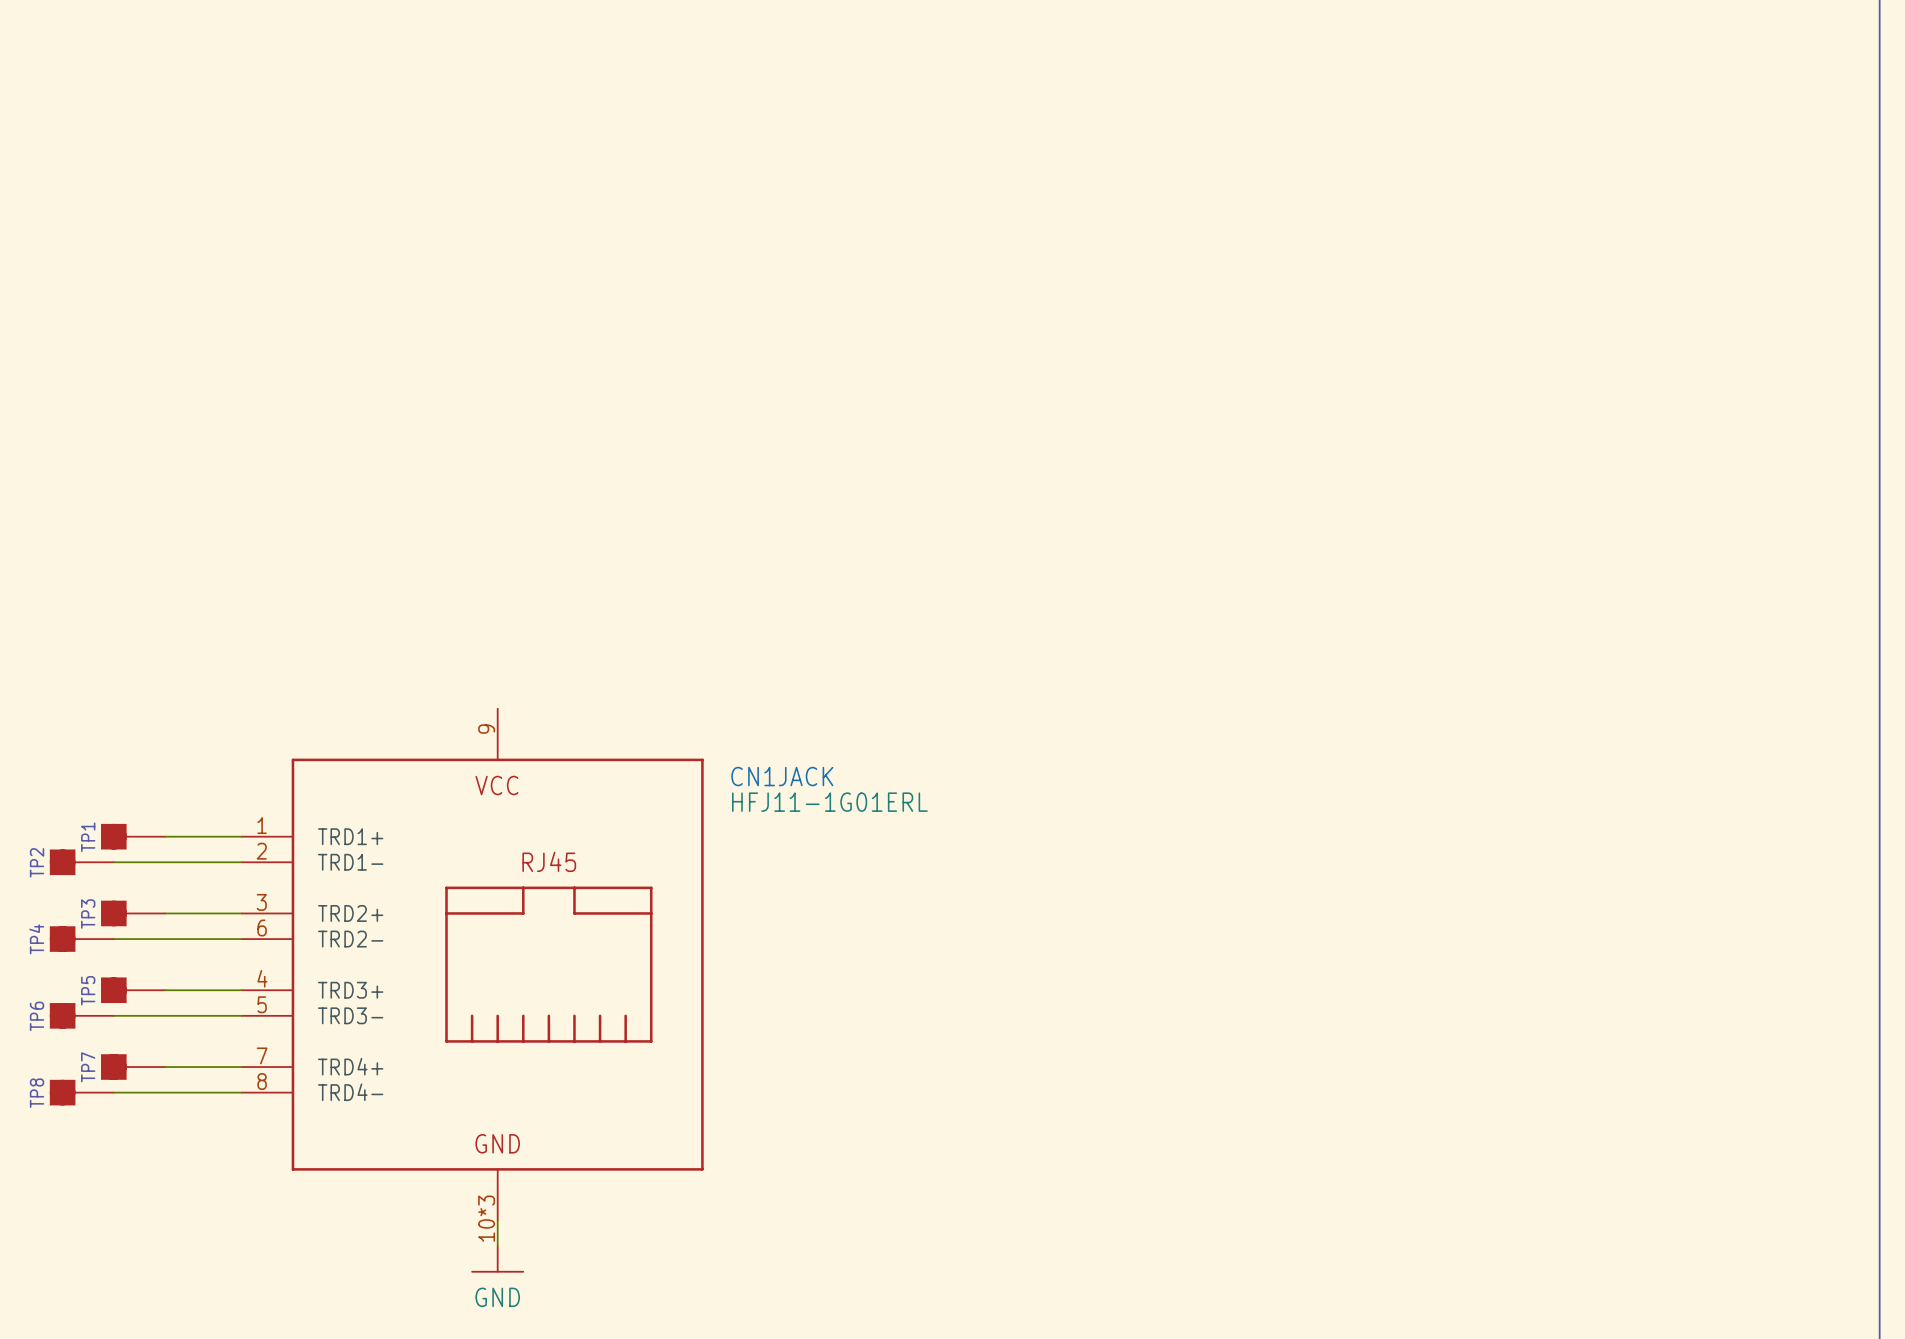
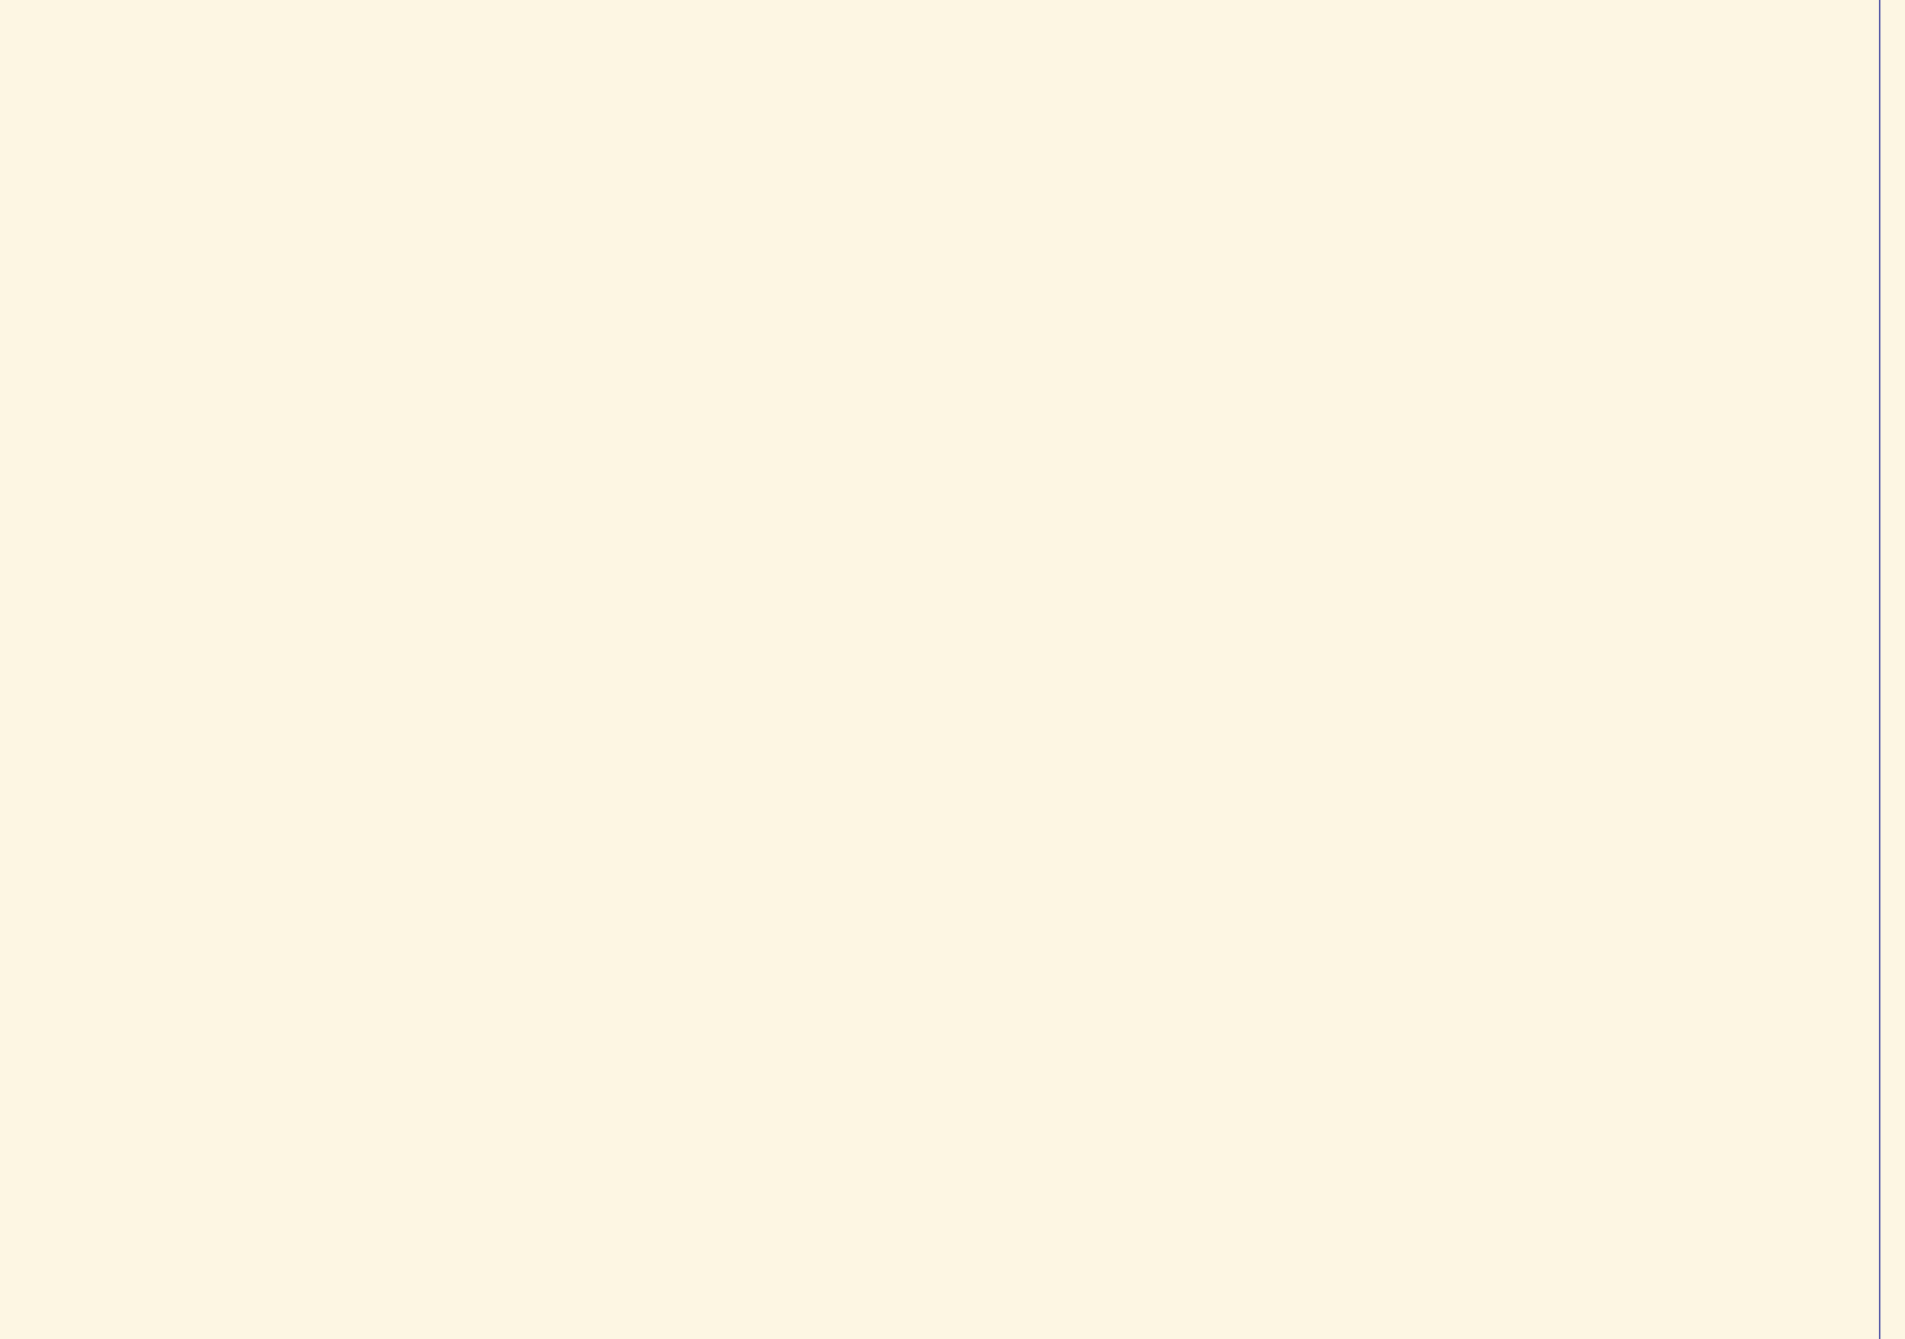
TP1: (133, 836) -> none
wire: (164, 836) (241, 836) -> none
TP2: (81, 862) -> none
wire: (113, 862) (241, 862) -> none
TP3: (133, 913) -> none
wire: (164, 913) (241, 913) -> none
TP4: (81, 939) -> none
wire: (113, 939) (241, 939) -> none
CN1JACK: HFJ11-1G01ERL (472, 964) -> none
TP5: (133, 990) -> none
wire: (164, 990) (241, 990) -> none
TP6: (81, 1015) -> none
wire: (113, 1015) (241, 1015) -> none
TP7: (133, 1067) -> none
wire: (164, 1067) (241, 1067) -> none
TP8: (81, 1092) -> none
wire: (113, 1092) (241, 1092) -> none
wire: (497, 1220) (497, 1246) -> none
power symbol: GND (497, 1259) -> none

